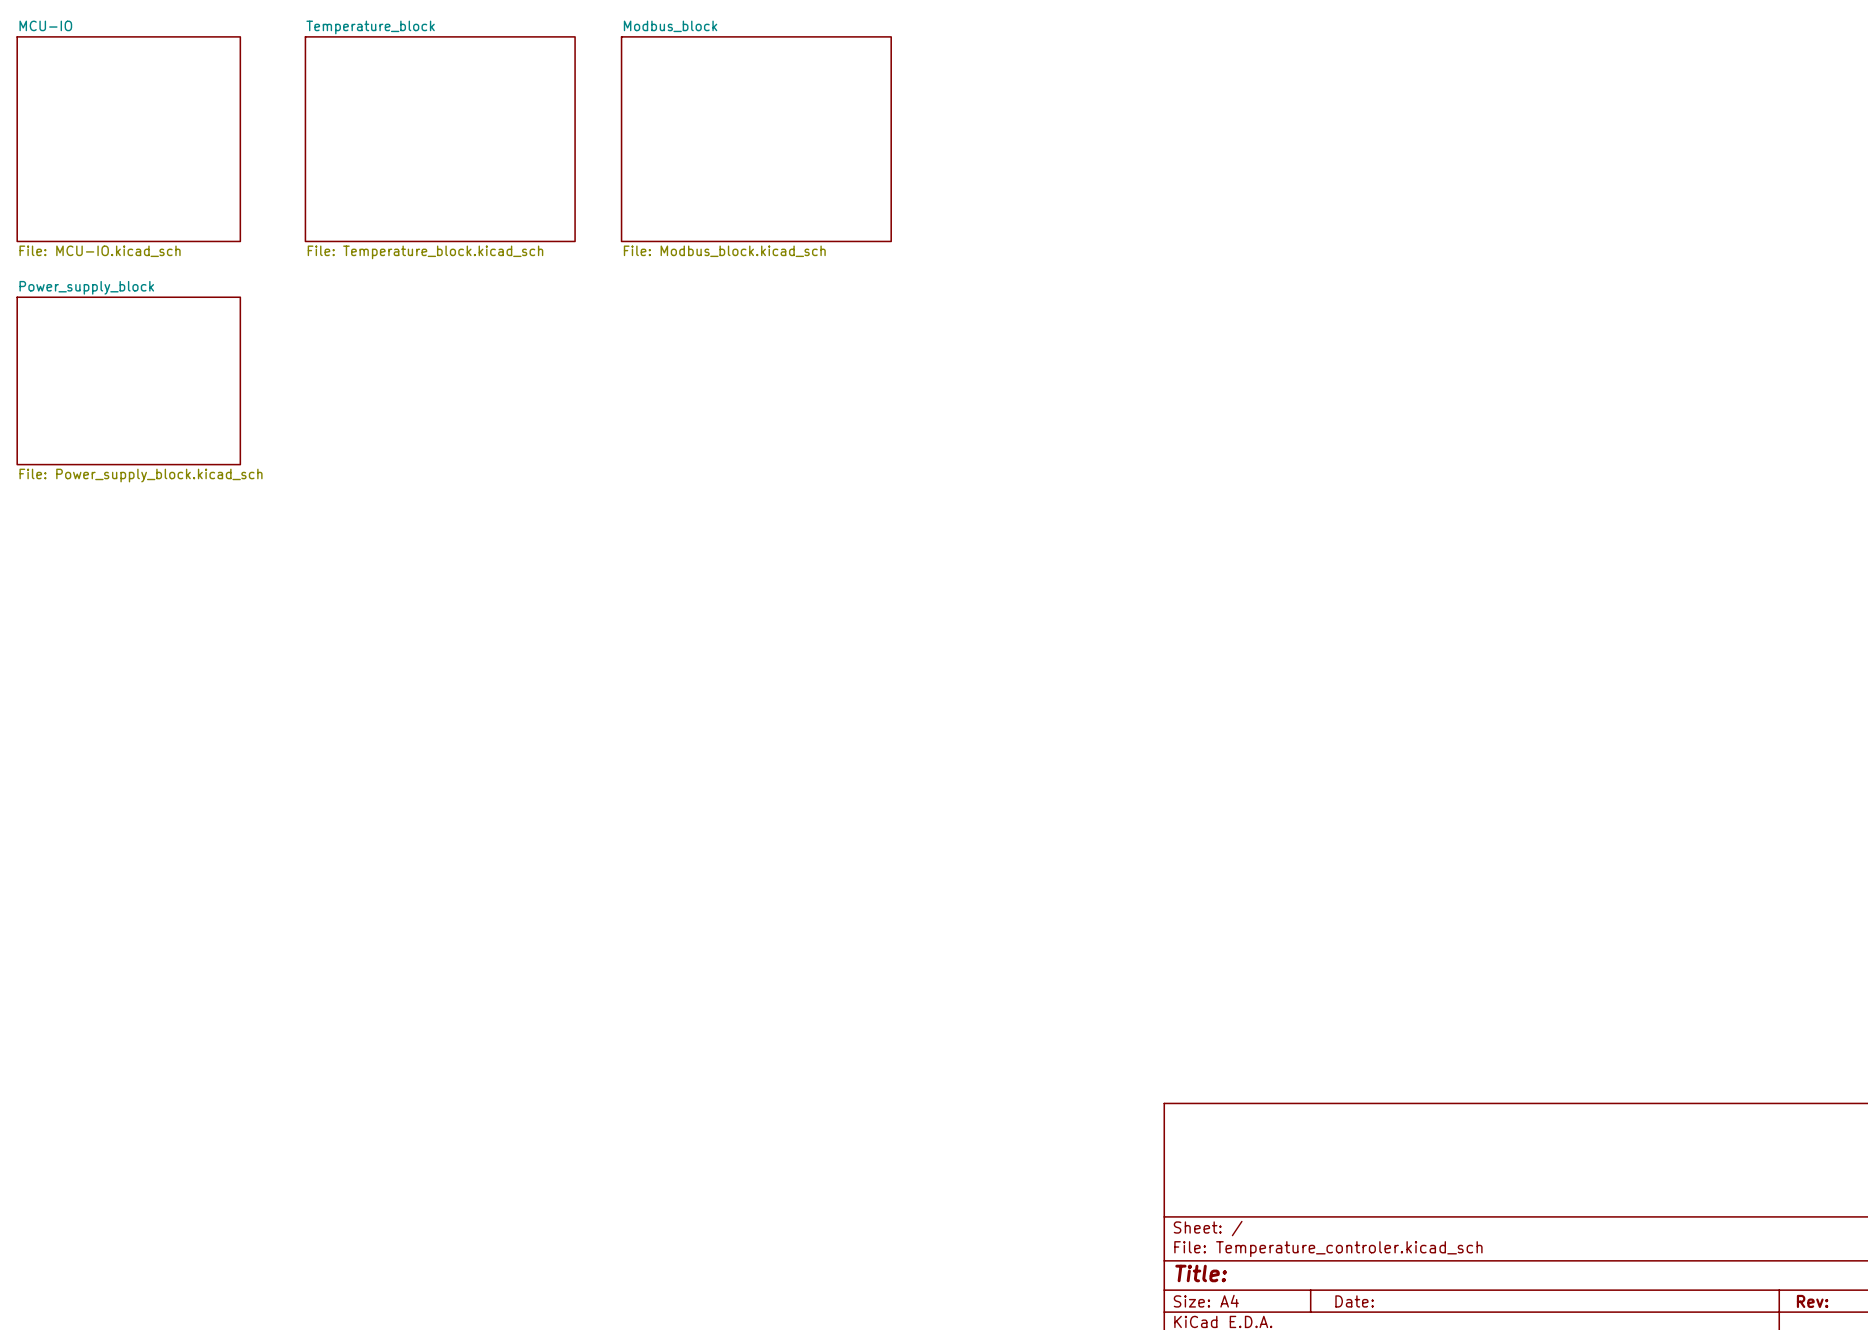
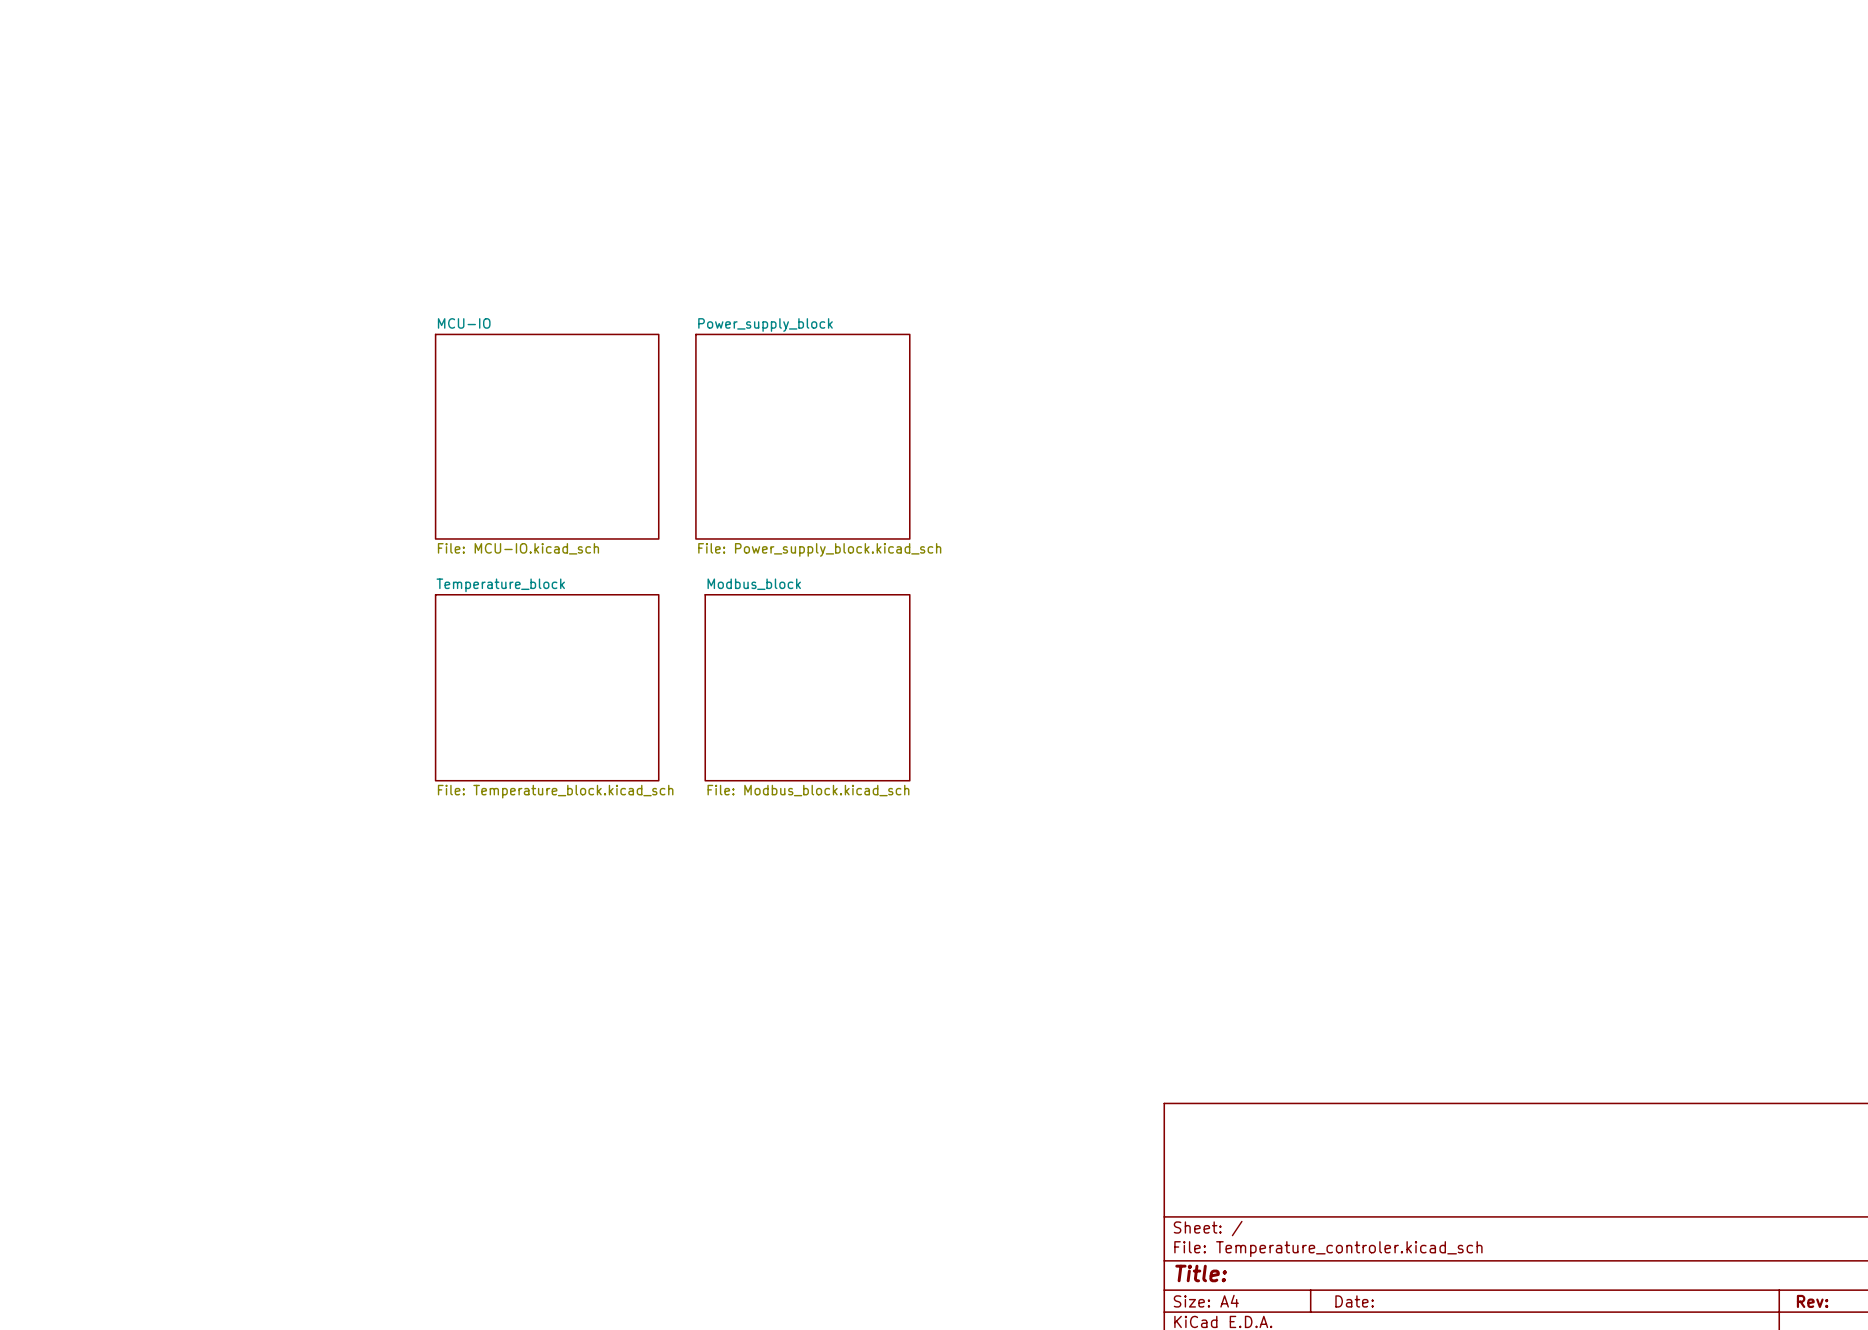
sheet MCU-IO: File: MCU-IO.kicad_sch (128, 139) -> none
sheet Temperature_block: File: Temperature_block.kicad_sch (440, 139) -> none
sheet Modbus_block: File: Modbus_block.kicad_sch (756, 139) -> none
sheet Power_supply_block: File: Power_supply_block.kicad_sch (128, 380) -> none
sheet MCU-IO: none -> File: MCU-IO.kicad_sch (547, 436)
sheet Power_supply_block: none -> File: Power_supply_block.kicad_sch (802, 436)
sheet Temperature_block: none -> File: Temperature_block.kicad_sch (547, 687)
sheet Modbus_block: none -> File: Modbus_block.kicad_sch (807, 687)

